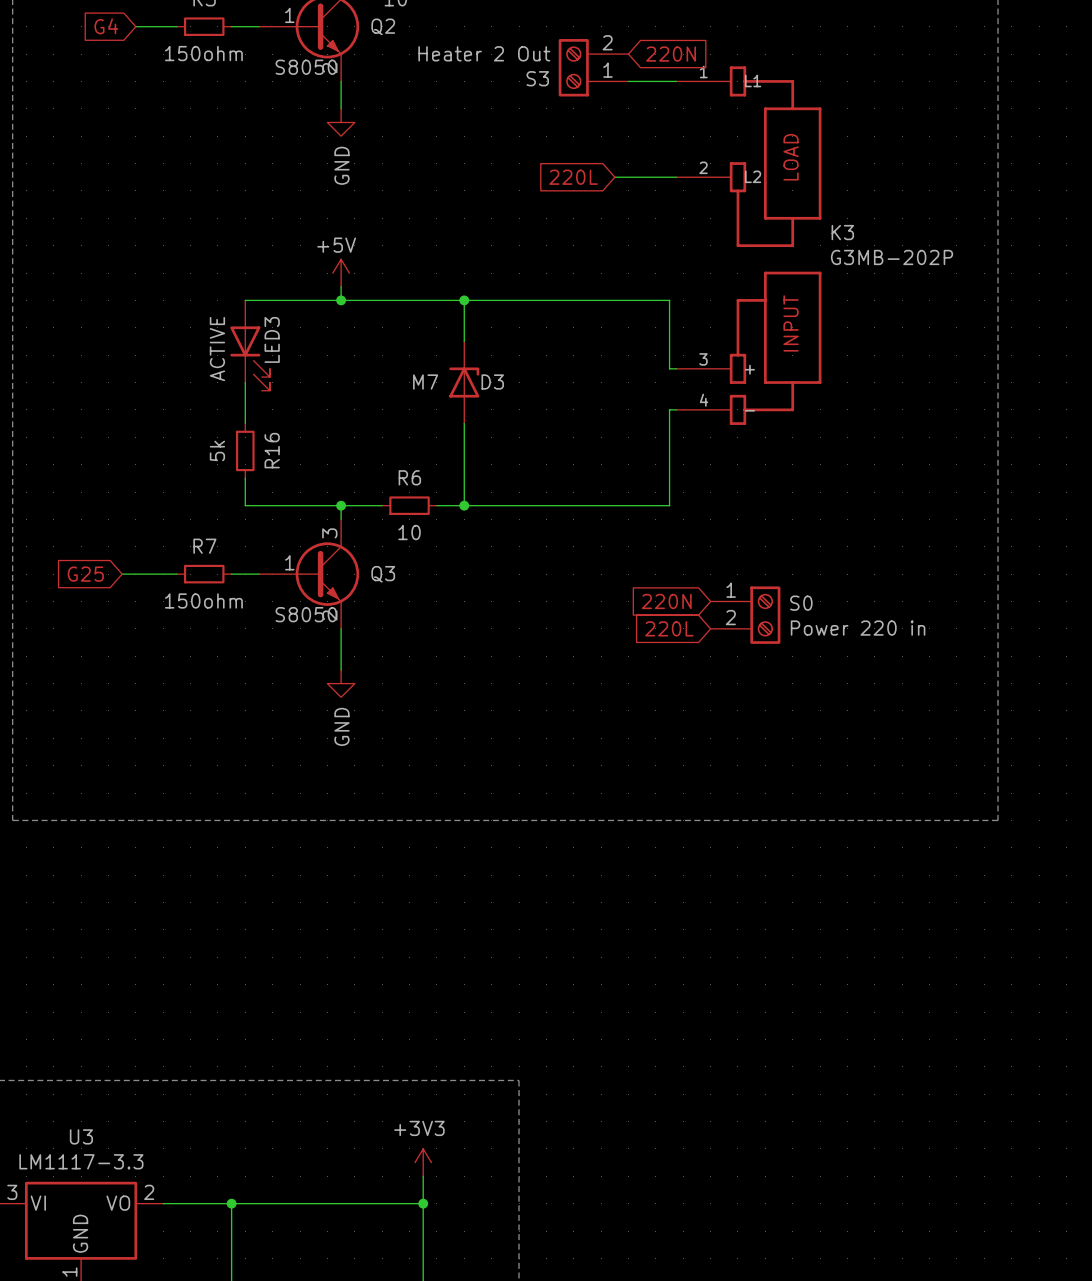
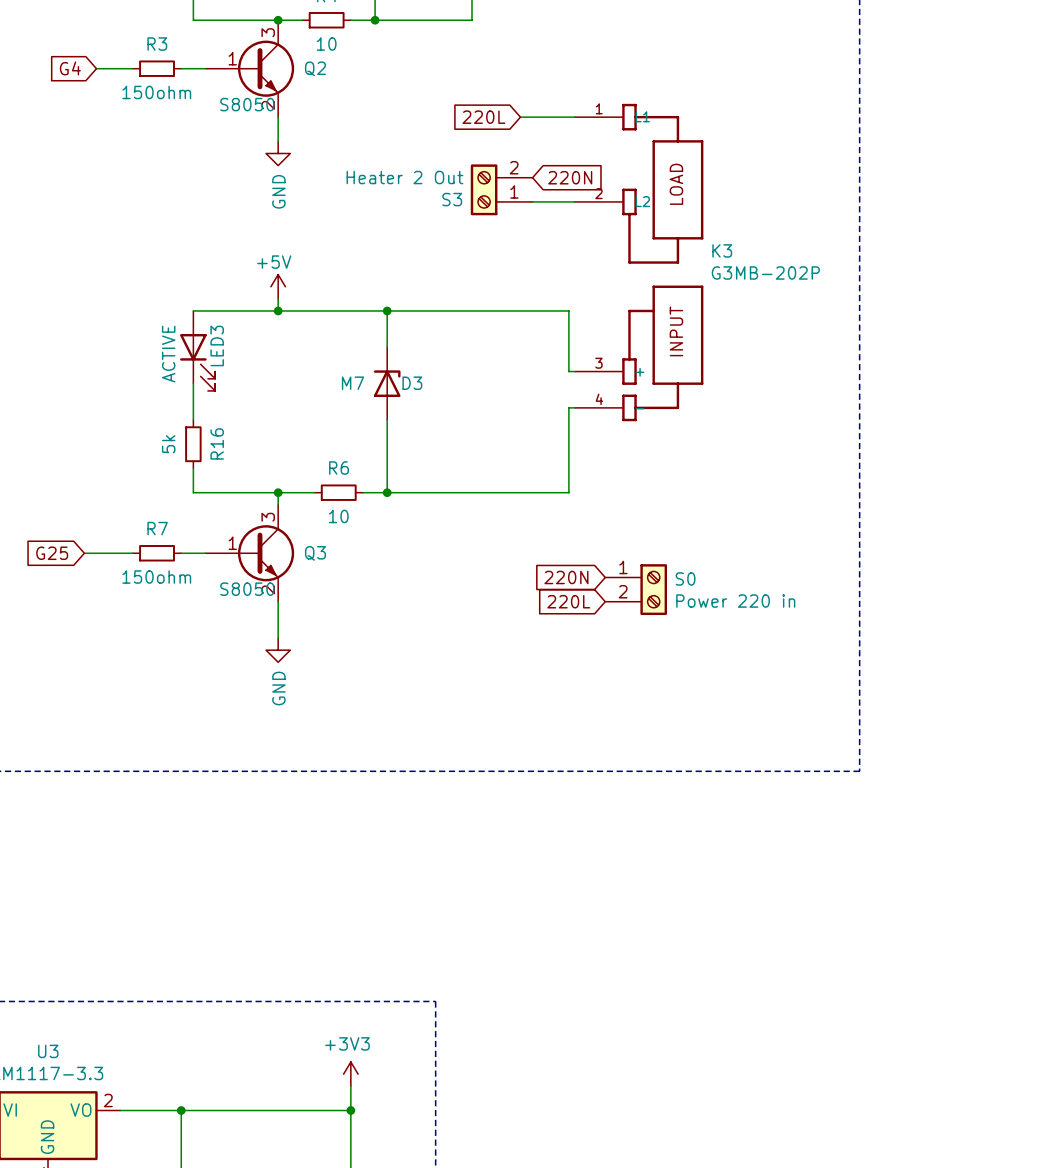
global label position: 220N (671, 54) -> 220N (570, 177)
S3 position: (593, 67) -> (501, 189)
global label position: 220L (573, 177) -> 220L (483, 117)

